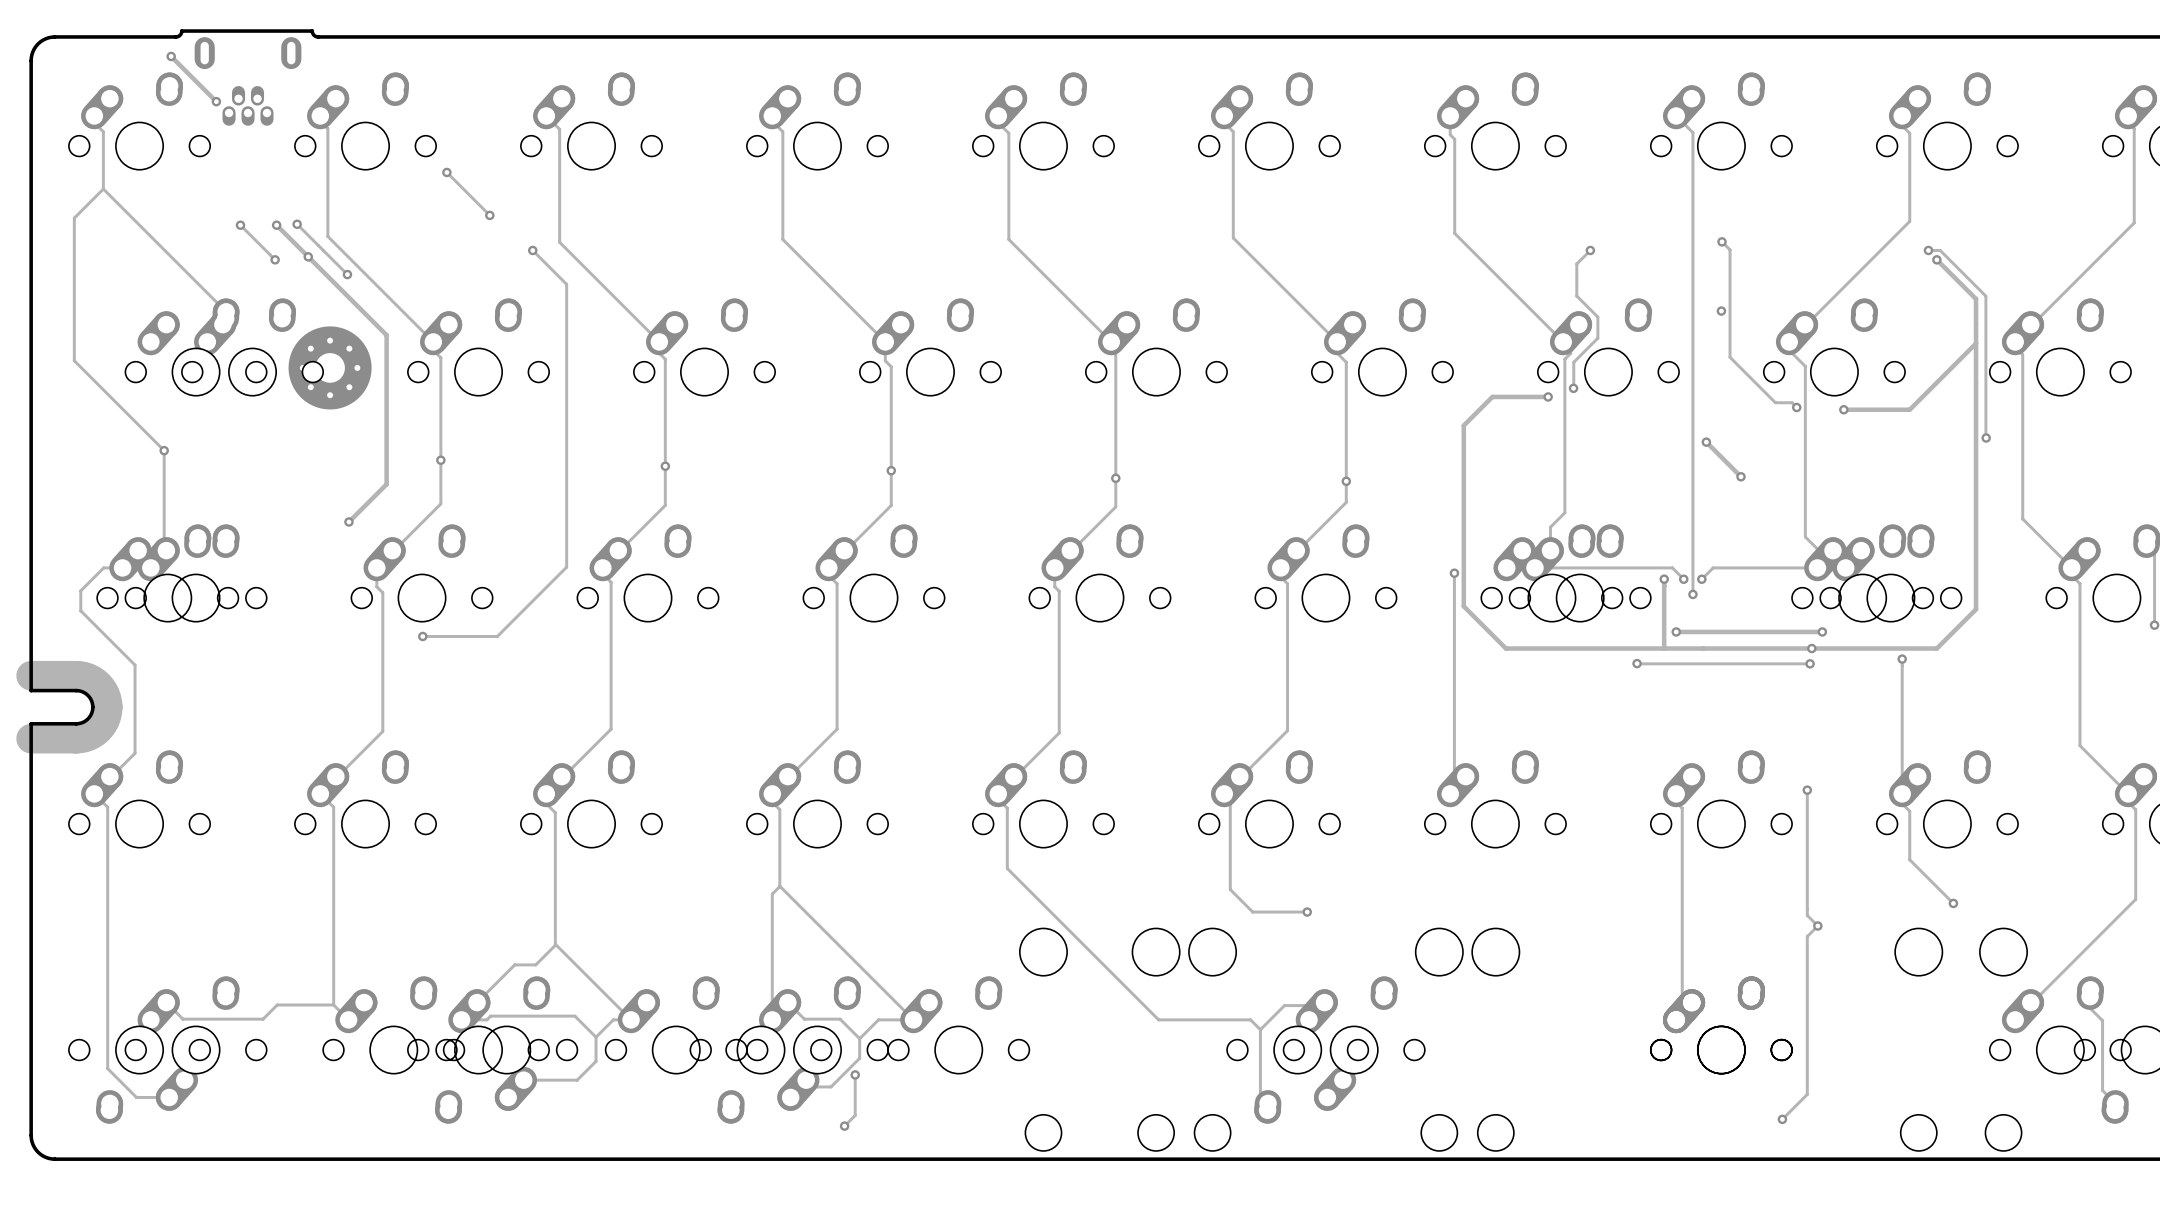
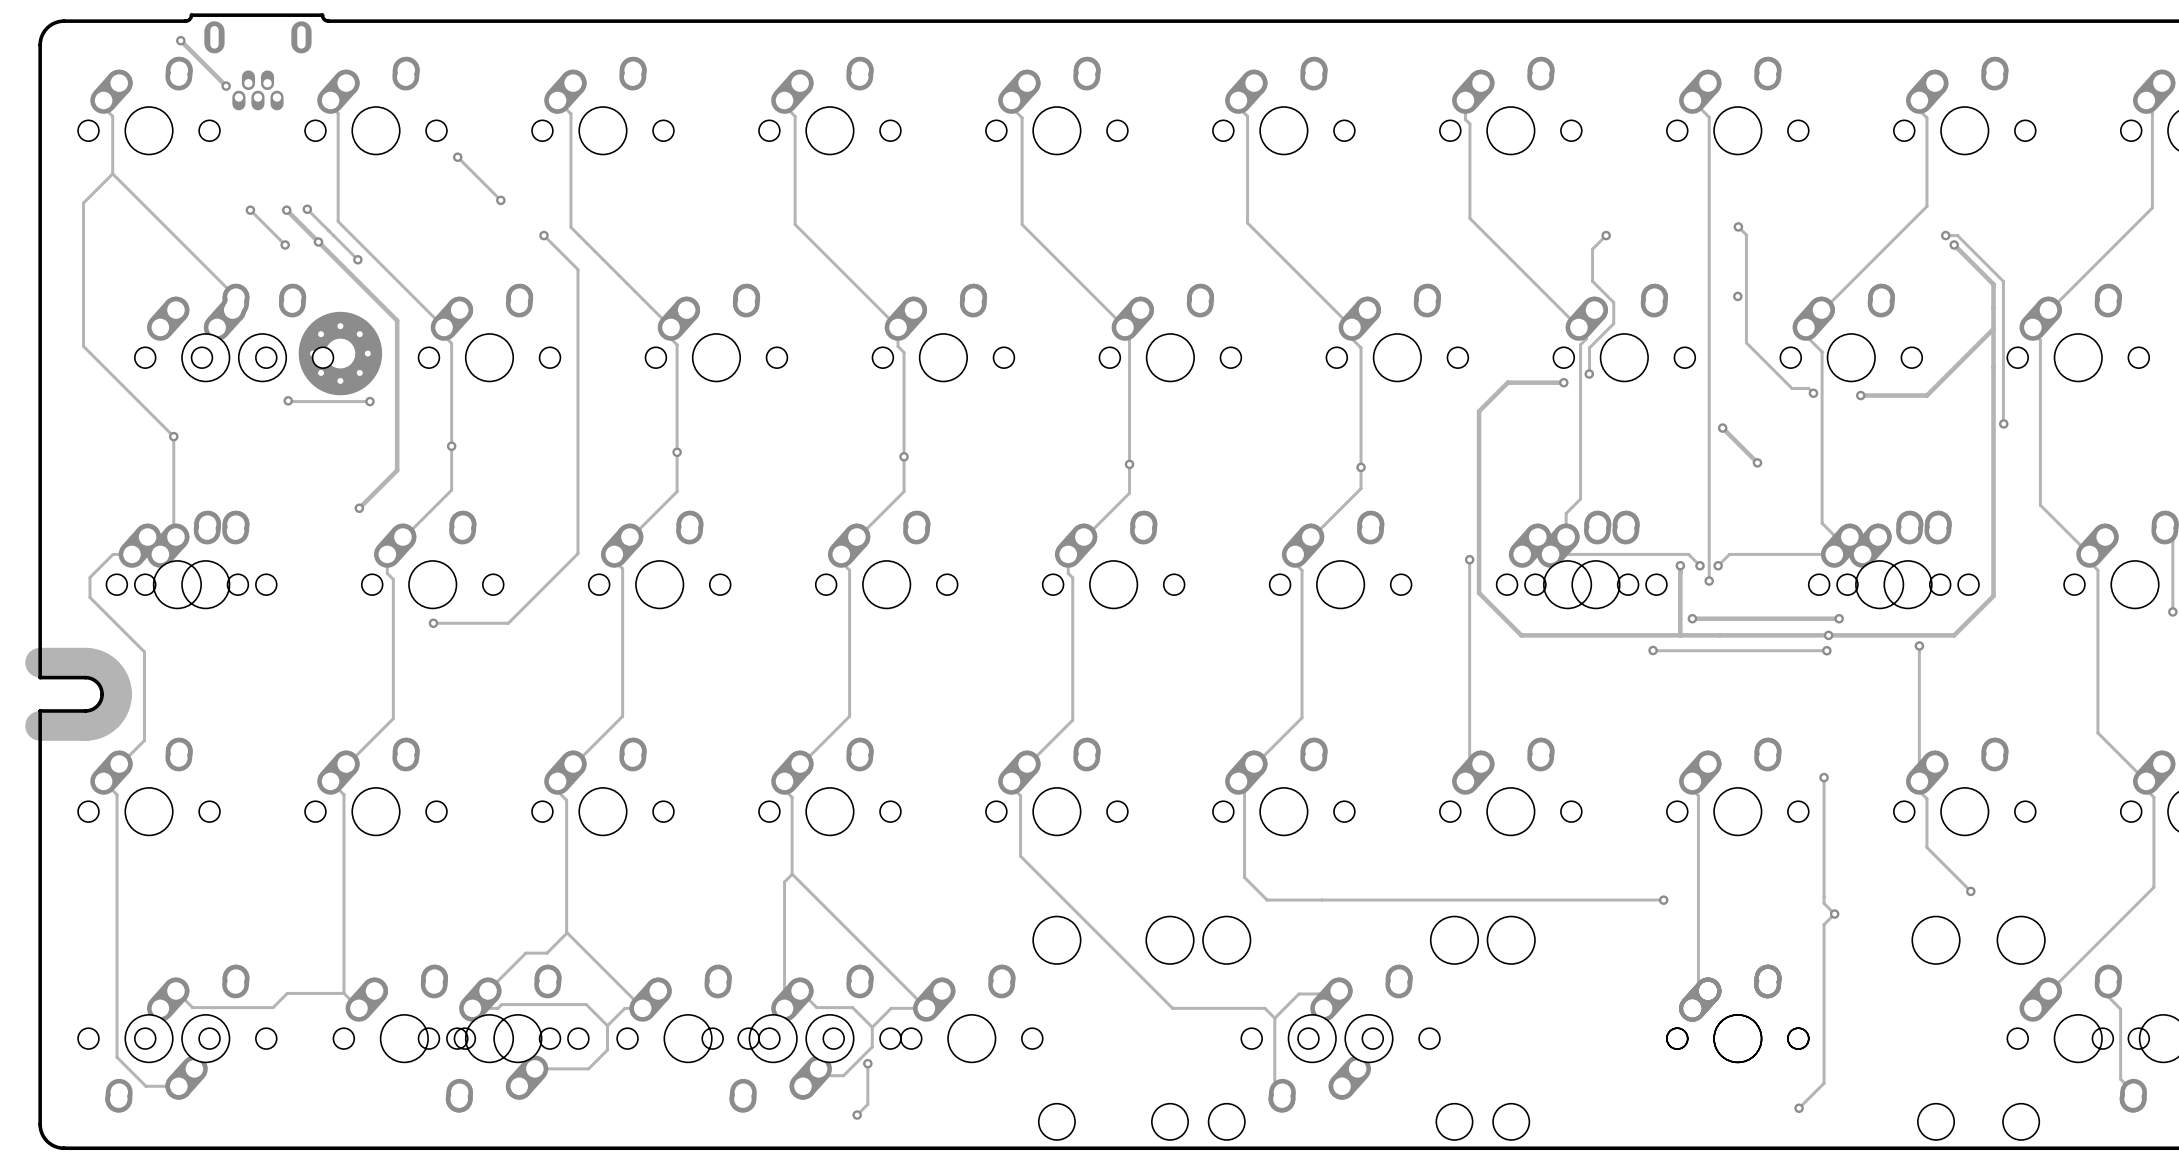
track: none -> (288, 400) (369, 401)
via: none -> (288, 400)
via: none -> (369, 401)
track: none -> (1321, 900) (1663, 900)
via: (1307, 912) -> none
via: none -> (1663, 900)

